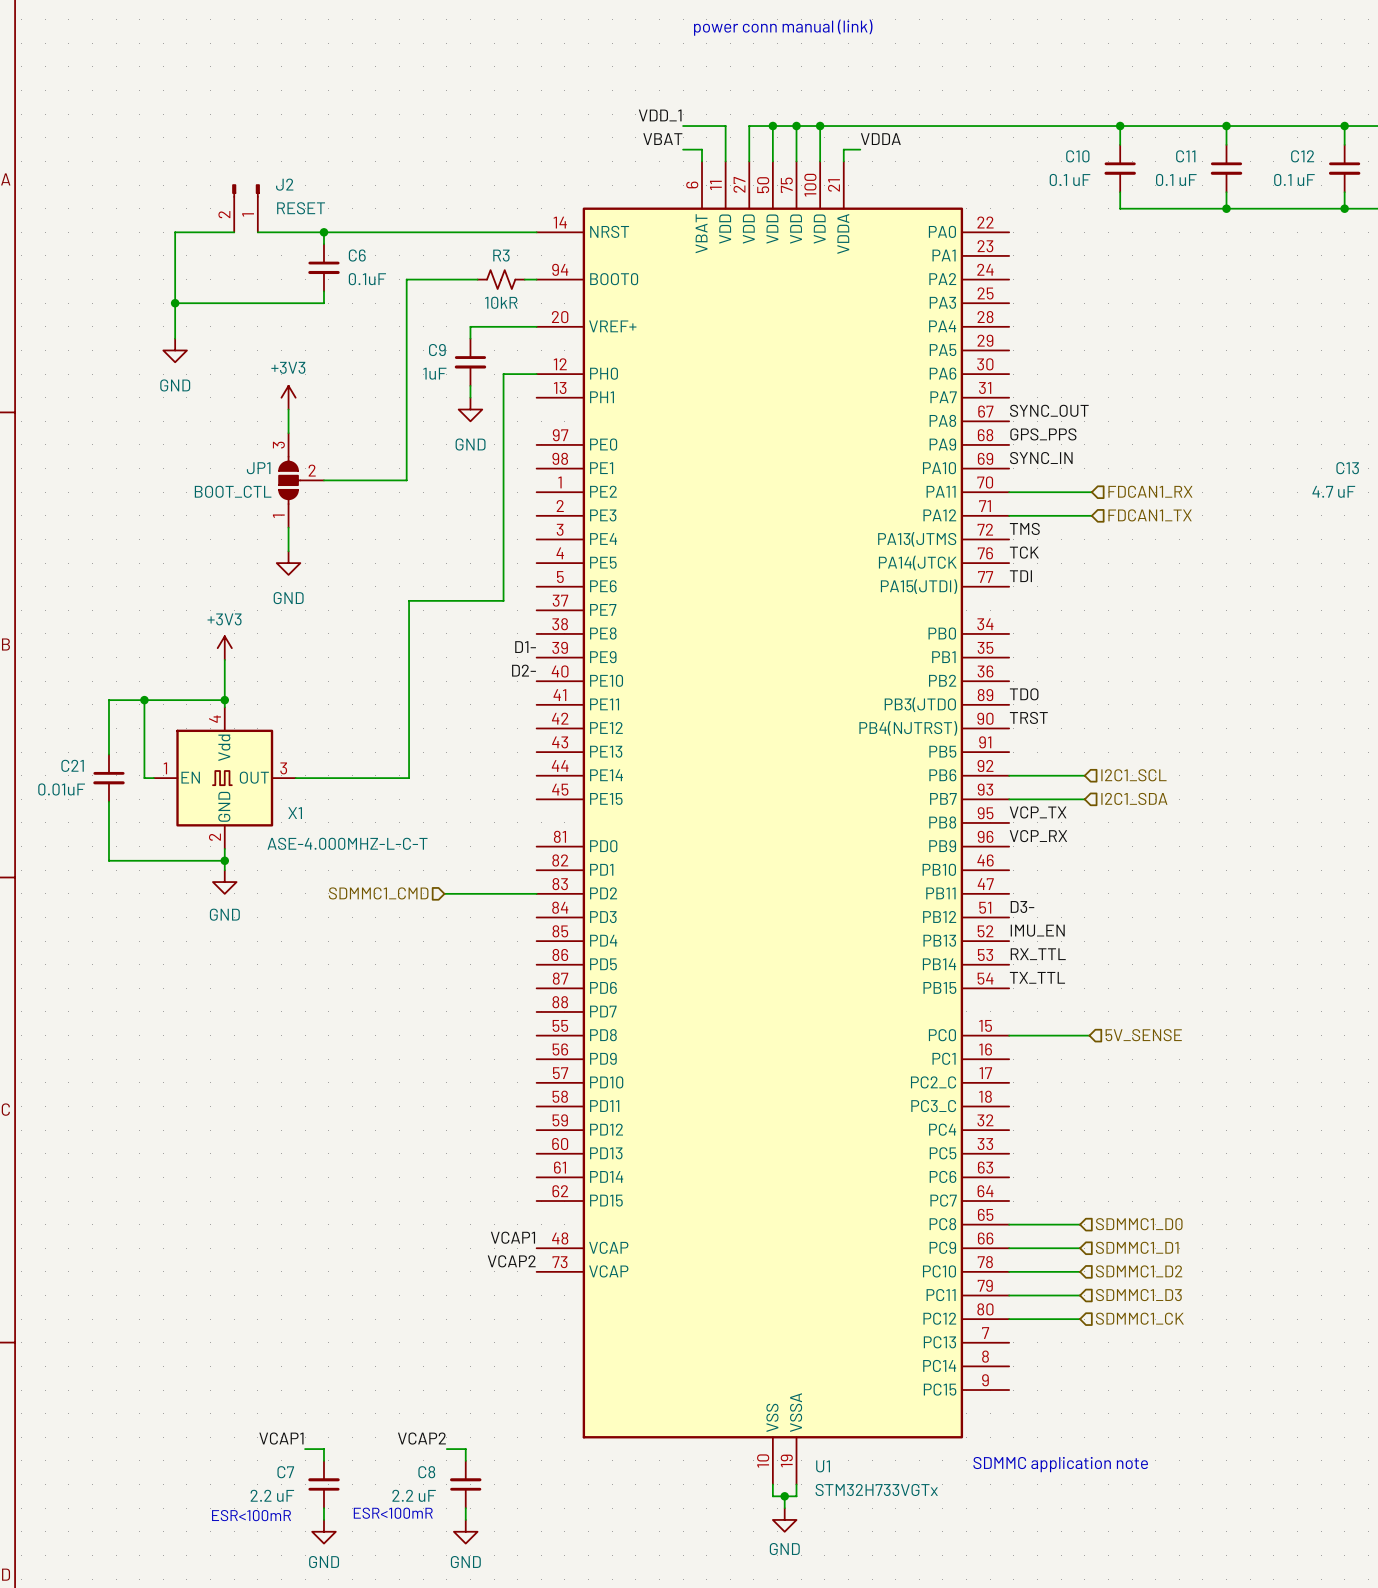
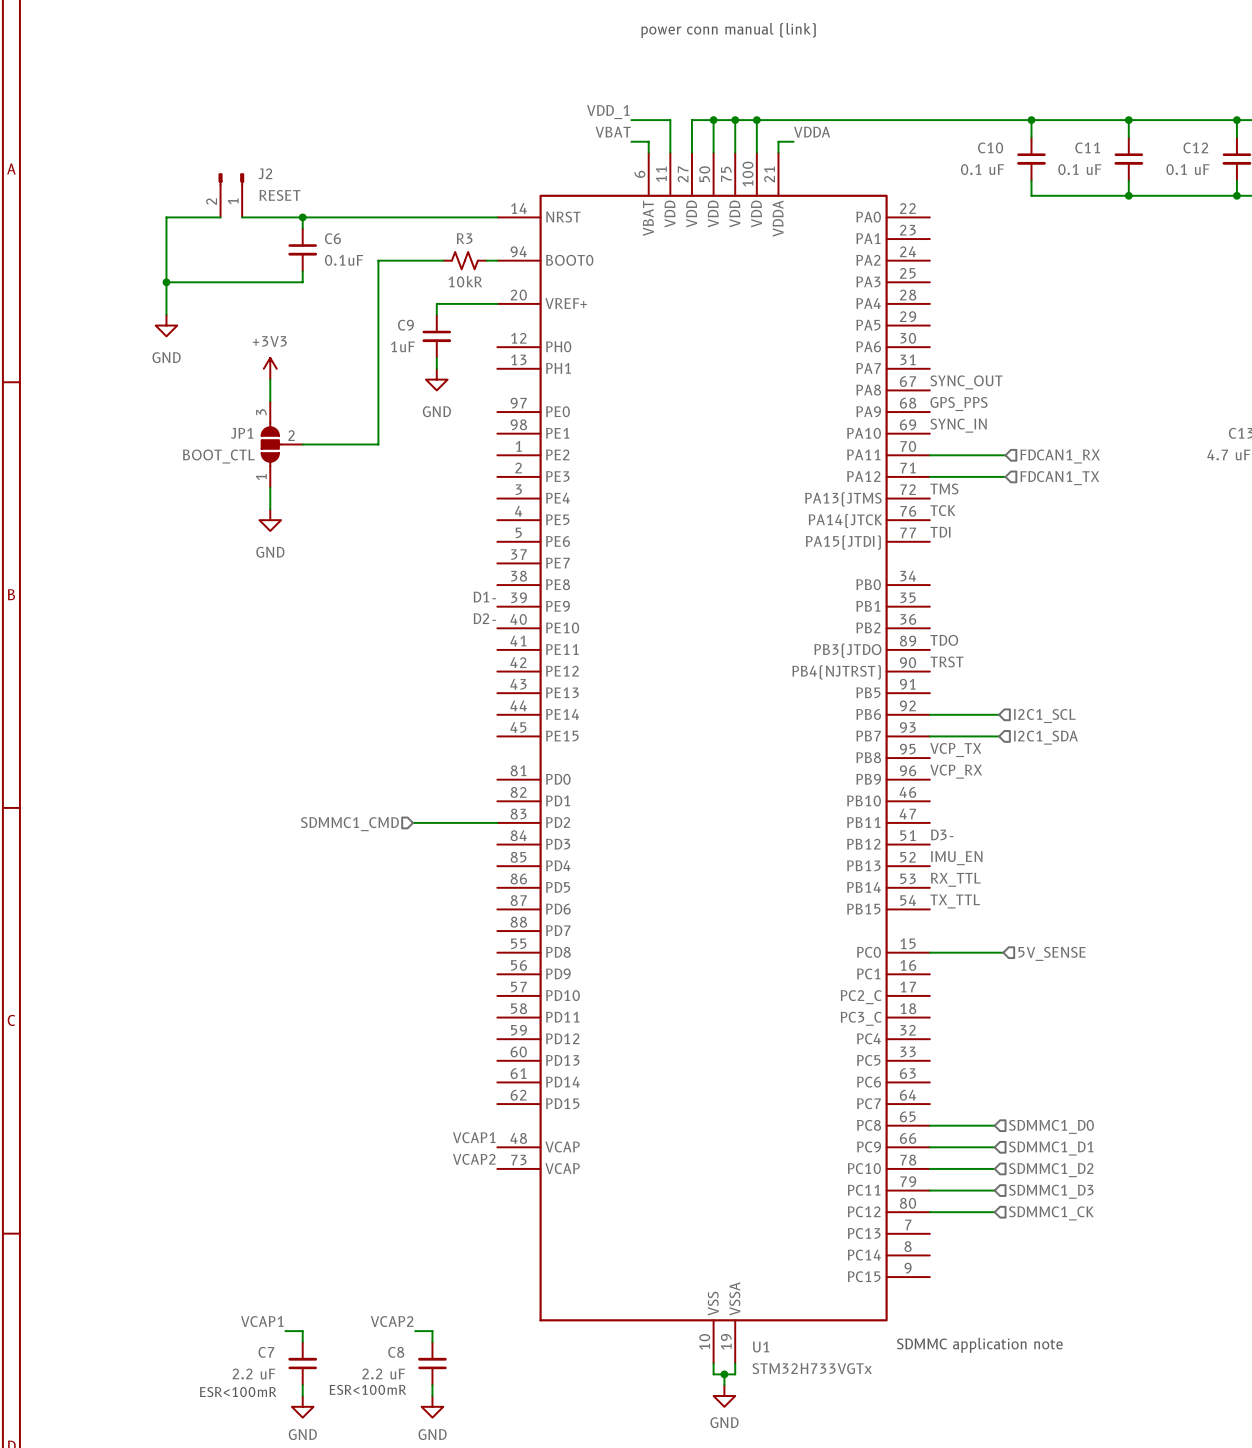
wire: (536, 374) (503, 374) (503, 600) (409, 600) (409, 778) (295, 778) -> none
power symbol: +3V3 (224, 648) -> none
wire: (224, 659) (224, 707) -> none
wire: (144, 700) (144, 778) (153, 778) -> none
junction: (144, 700) -> none
wire: (224, 700) (108, 700) (108, 754) -> none
junction: (224, 700) -> none
C21: 0.01uF (108, 778) -> none
X1: ASE-4.000MHZ-L-C-T (224, 778) -> none
wire: (108, 801) (108, 860) (224, 860) -> none
wire: (224, 848) (224, 870) -> none
junction: (224, 860) -> none
power symbol: GND (224, 882) -> none

